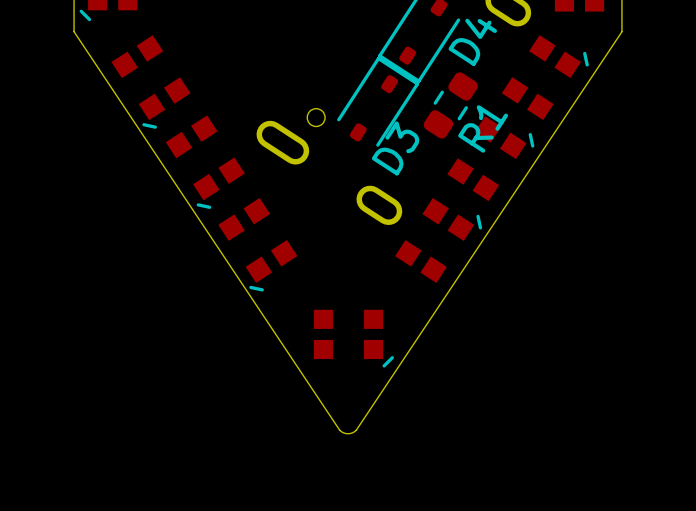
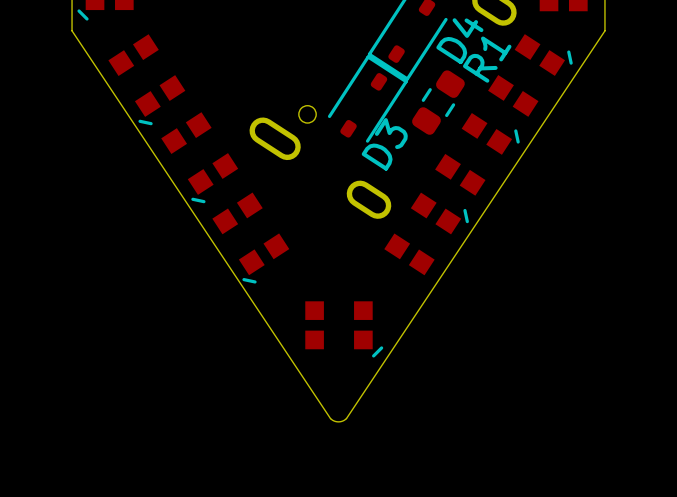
R1 name position: R1 (483, 128) -> R1 (487, 59)

